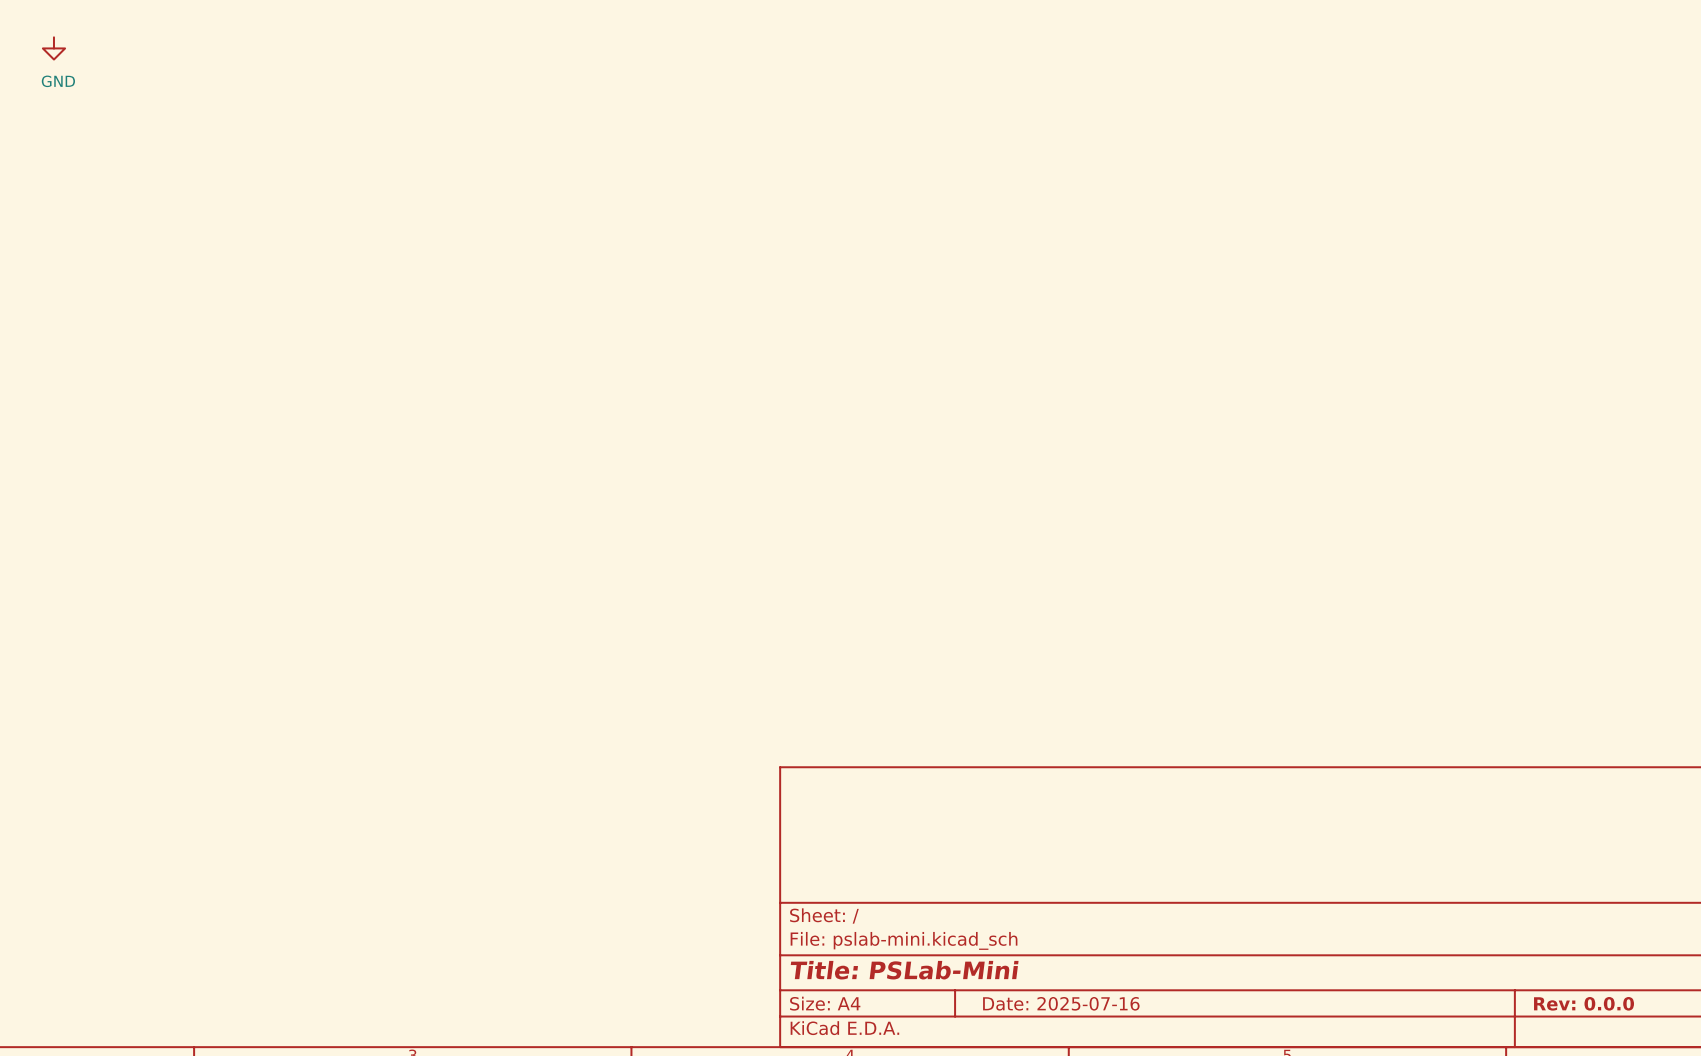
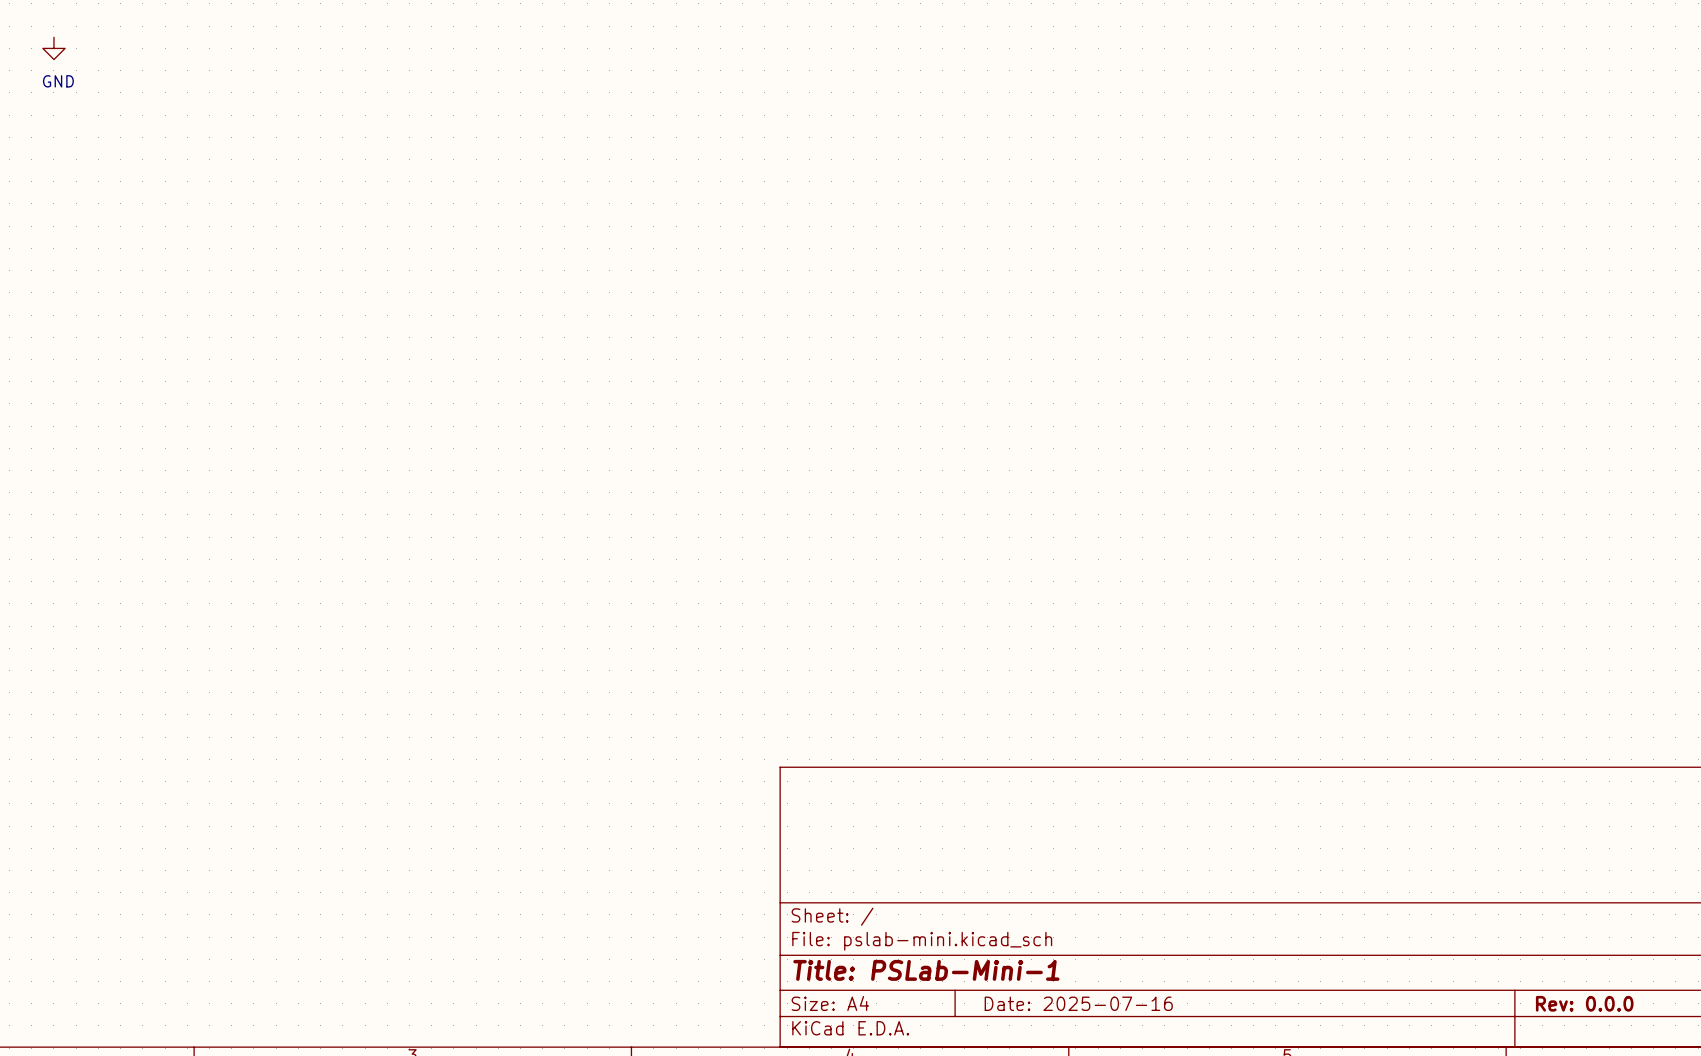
title block: Title: PSLab-Mini (904, 970) -> Title: PSLab-Mini-1 (926, 970)

